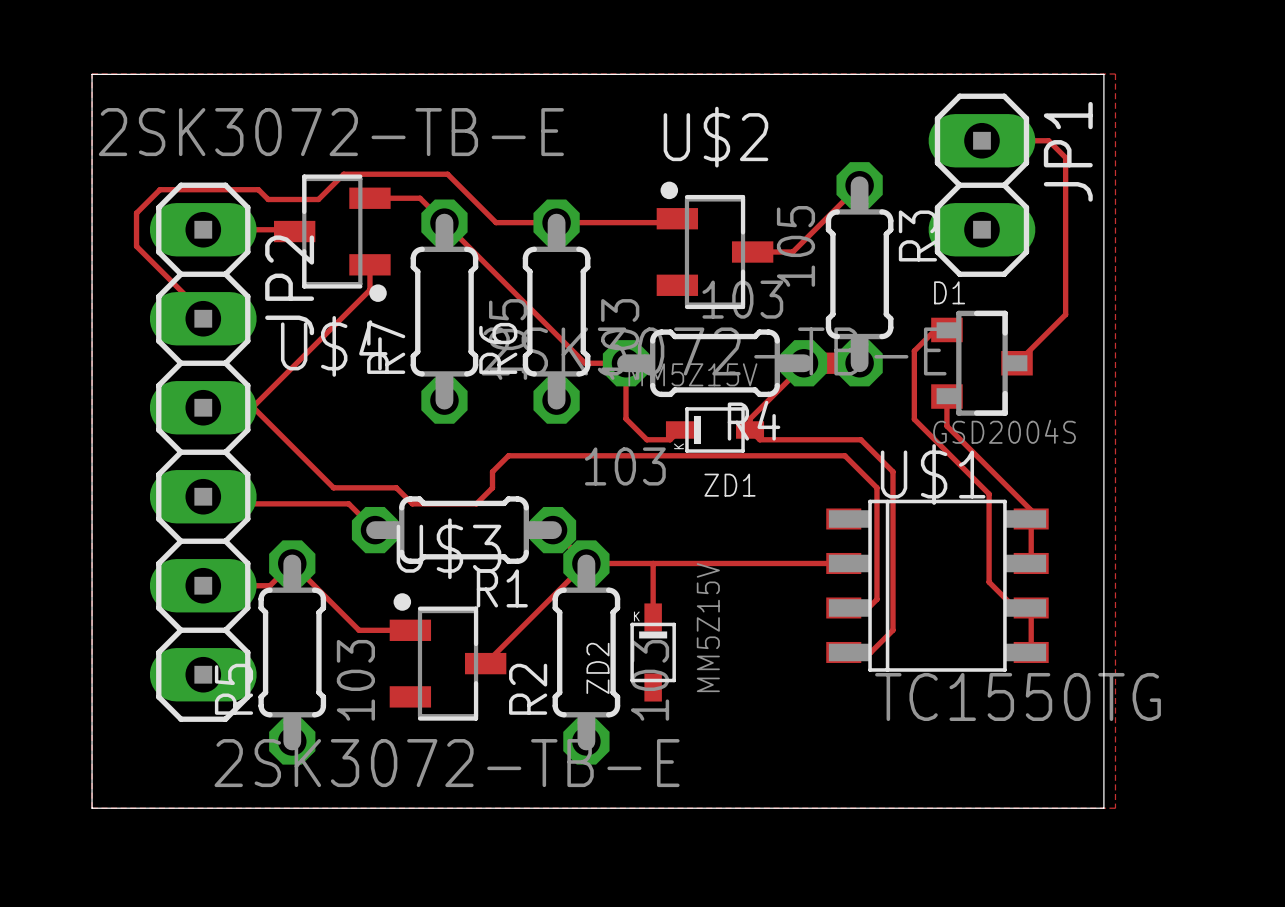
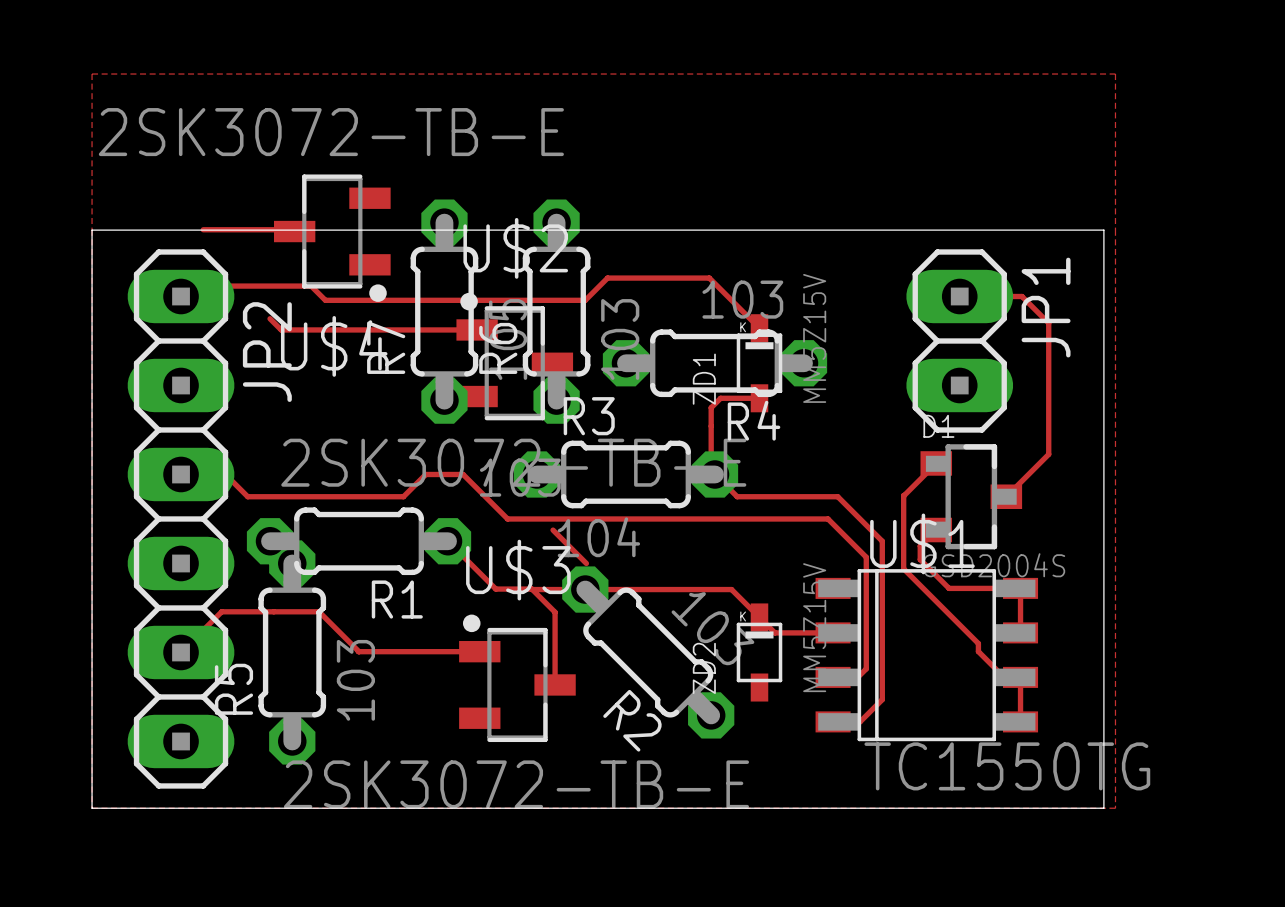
top track: (981, 140) (1048, 140) (1065, 157) (1065, 314) (1017, 363) -> none
top track: (859, 185) (792, 252) (752, 252) -> none
JP1 position: (981, 185) -> (959, 341)
top track: (369, 198) (420, 198) (585, 363) (626, 363) (626, 418) (646, 439) (670, 439) (679, 429) -> none
top track: (677, 218) (673, 222) (496, 222) (447, 174) (343, 174) (318, 199) (268, 199) (258, 189) (159, 189) (136, 213) (136, 246) (203, 313) (203, 318) -> none
board edge: (92, 230) (92, 74) (1103, 74) (1103, 230) -> (92, 230) (1103, 230)
R3 name position: R3 (917, 235) -> R3 (589, 416)
U$2 position: (715, 245) -> (514, 356)
R3 value: 105 (795, 246) -> 104 (598, 537)
top track: (369, 264) (369, 290) (252, 407) -> none
R3 rotation: 0° (859, 274) -> 90° clockwise (626, 474)
R3 position: (859, 274) -> (626, 474)
top track: none -> (181, 296) (191, 286) (311, 286) (325, 300) (585, 300) (607, 278) (709, 278) (759, 328)
top track: none -> (959, 296) (1022, 296) (1048, 323) (1048, 454) (1006, 496)
top track: none -> (270, 318) (281, 329) (477, 329) (473, 333)
top track: (946, 329) (935, 329) (914, 350) (914, 419) (989, 494) (989, 582) (1014, 607) (1031, 607) (1031, 652) -> none
top track: (859, 363) (803, 363) (750, 418) (750, 429) (759, 439) (860, 439) (892, 471) (892, 630) (870, 652) (843, 652) -> none
D1 position: (981, 363) -> (971, 496)
top track: (946, 396) (946, 426) (1031, 510) (1031, 563) -> none
top track: none -> (759, 398) (720, 398) (711, 407) (711, 470) (737, 496) (837, 496) (882, 541) (882, 699) (860, 721) (833, 721)
top track: (203, 407) (253, 407) (333, 487) (396, 487) (412, 503) (476, 503) (492, 487) (492, 471) (508, 455) (844, 455) (876, 487) (876, 599) (868, 607) (843, 607) -> none
ZD1 rotation: 0° (715, 429) -> 90° clockwise (759, 363)
ZD1 position: (715, 429) -> (759, 363)
JP2 position: (203, 452) -> (181, 518)
top track: none -> (936, 463) (904, 495)
top track: none -> (181, 474) (225, 474) (247, 496) (403, 496) (425, 474) (463, 474) (507, 518) (828, 518) (866, 557) (866, 668) (857, 677) (833, 677)
top track: none -> (903, 495) (903, 568) (978, 643) (978, 651) (1004, 677) (1020, 677) (1020, 721)
top track: (203, 496) (235, 496) (242, 503) (348, 503) (375, 530) -> none
R1 position: (464, 530) -> (359, 541)
top track: none -> (936, 530) (920, 546) (920, 559) (949, 588) (1020, 588) (1020, 632)
top track: none -> (448, 541) (495, 589) (531, 589) (555, 612) (555, 684)
top track: (653, 563) (653, 617) -> none
top track: (843, 563) (585, 563) (485, 663) -> none
top track: (203, 585) (270, 585) (292, 563) (359, 630) (410, 630) -> none
U$1 position: (937, 585) -> (926, 655)
top track: none -> (532, 589) (731, 589) (774, 632) (833, 632)
top track: none -> (358, 651) (479, 651)
top track: none -> (359, 651) (319, 611) (221, 611) (181, 652)
R2 rotation: 0° (586, 652) -> 45° counterclockwise (648, 652)
ZD2 position: (653, 652) -> (759, 652)
U$3 position: (448, 656) -> (517, 678)

